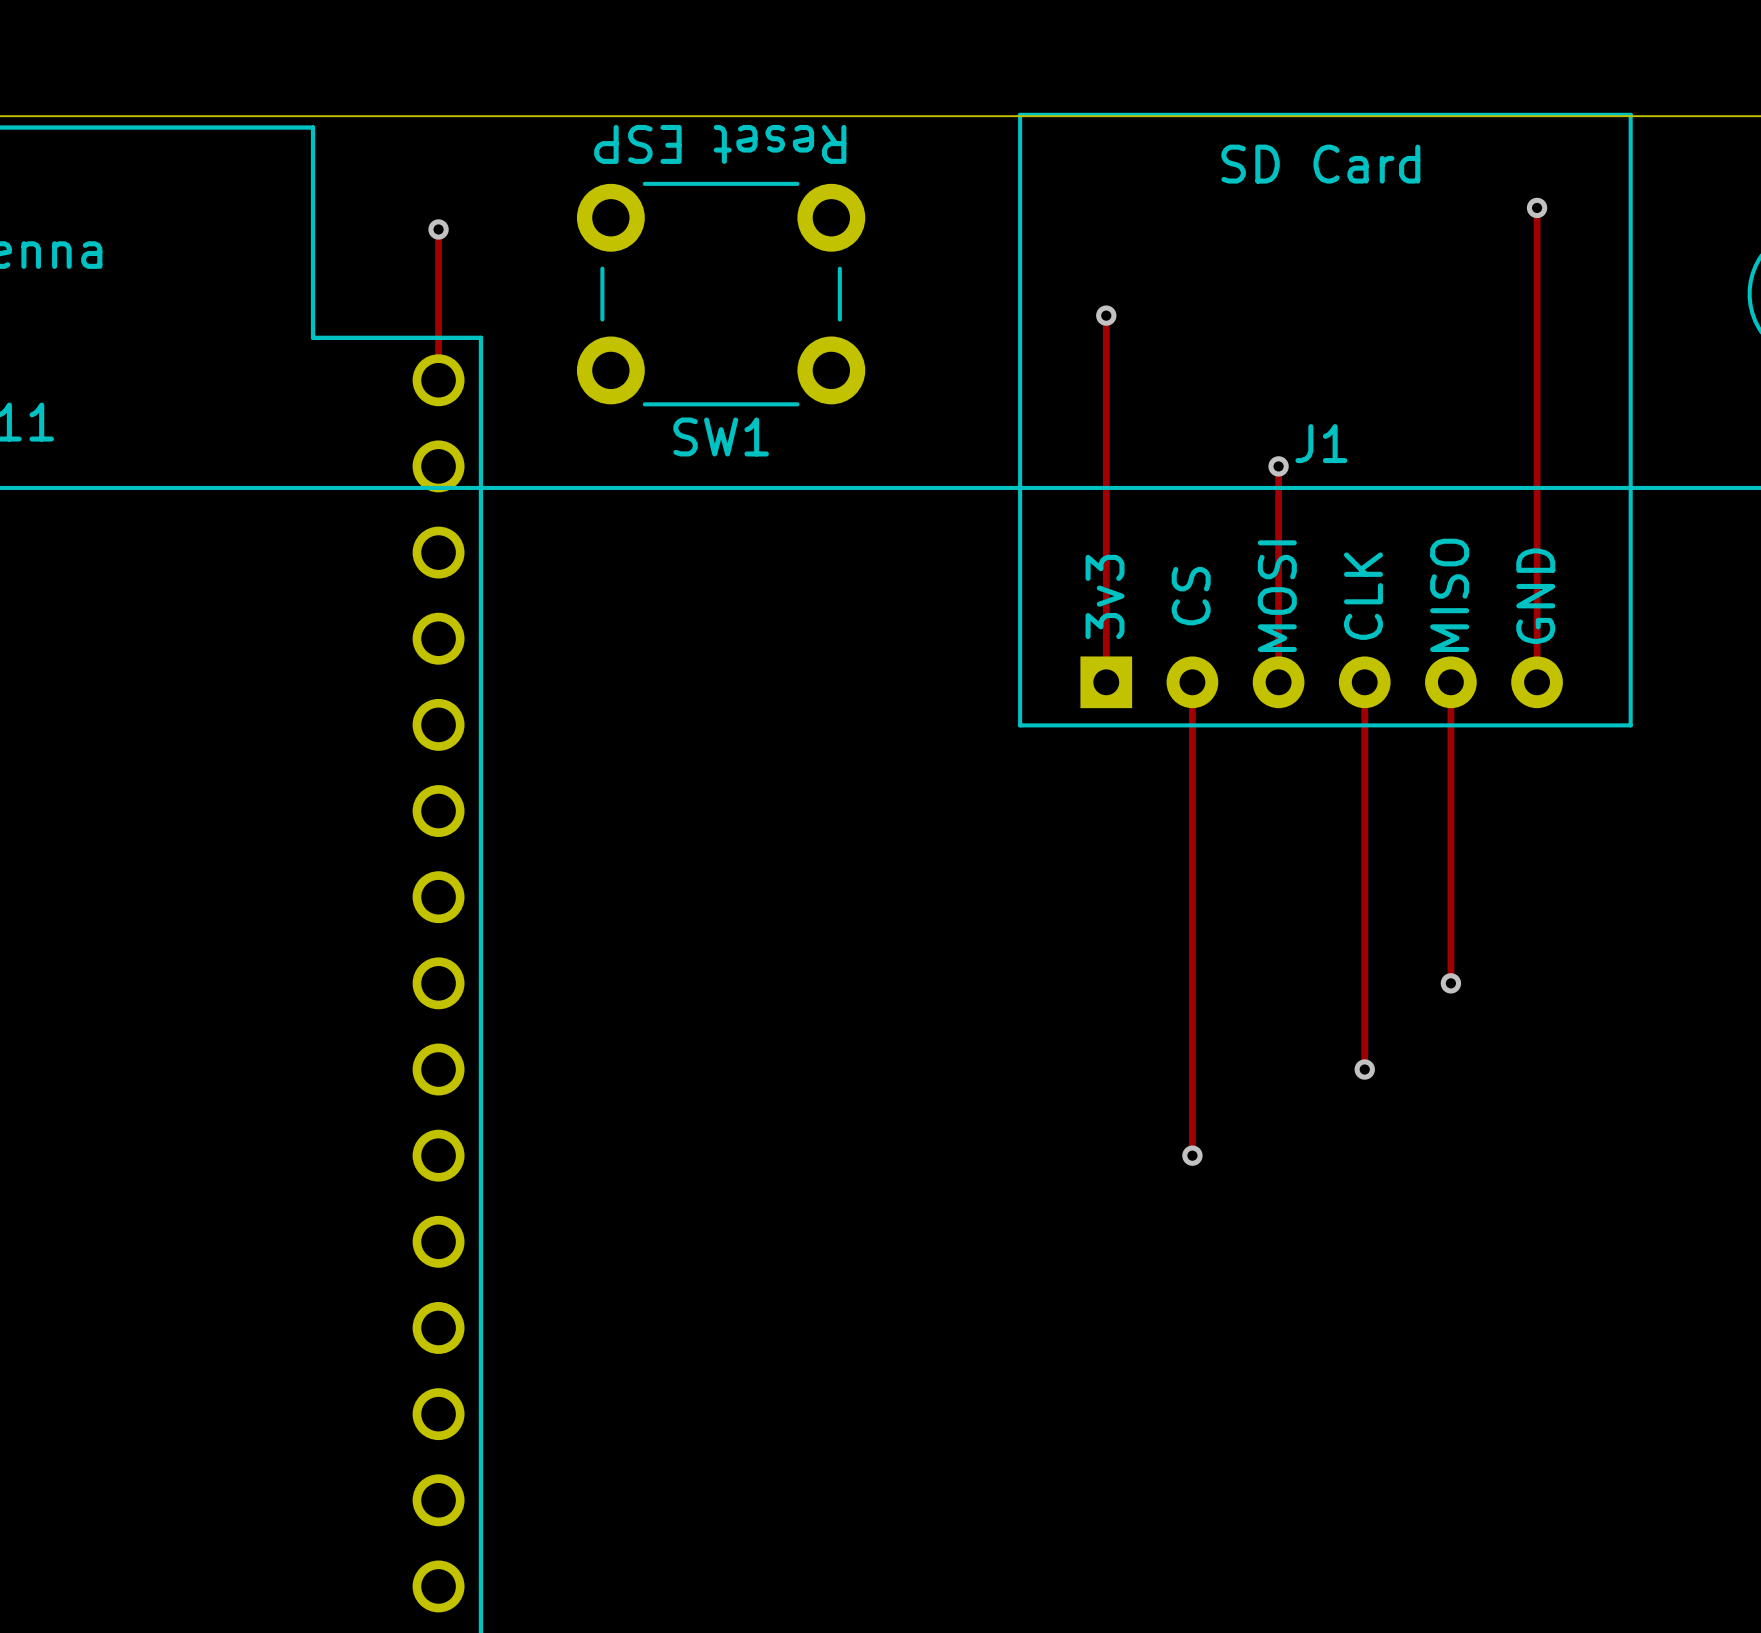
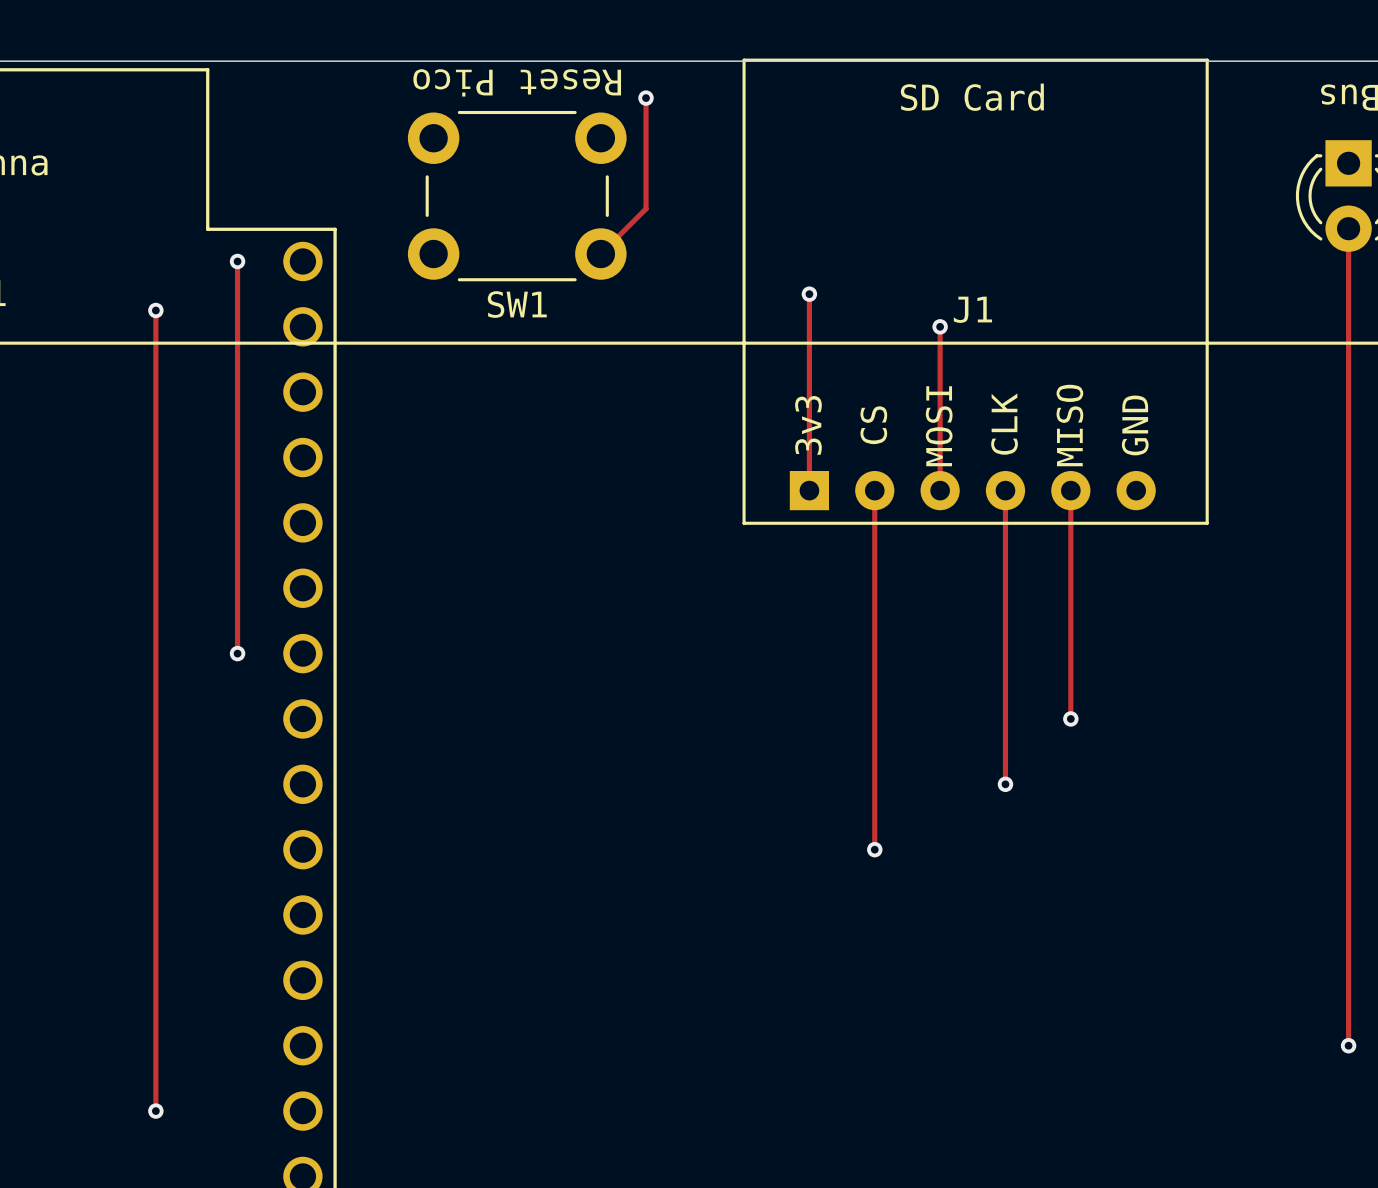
SW1 value: Reset ESP (720, 144) -> Reset Pico (517, 82)
track: none -> (646, 98) (646, 208) (600, 254)
via: none -> (646, 98)
track: (1537, 207) (1537, 682) -> none
via: (1537, 207) -> none
track: (438, 229) (438, 380) -> none
via: (438, 229) -> none
track: (1106, 315) (1106, 423) -> none
via position: (1106, 315) -> (809, 294)
track: none -> (237, 261) (237, 653)
via: none -> (237, 261)
track: none -> (155, 310) (155, 1111)
via: none -> (155, 310)
via: none -> (237, 653)
via: none -> (155, 1111)

